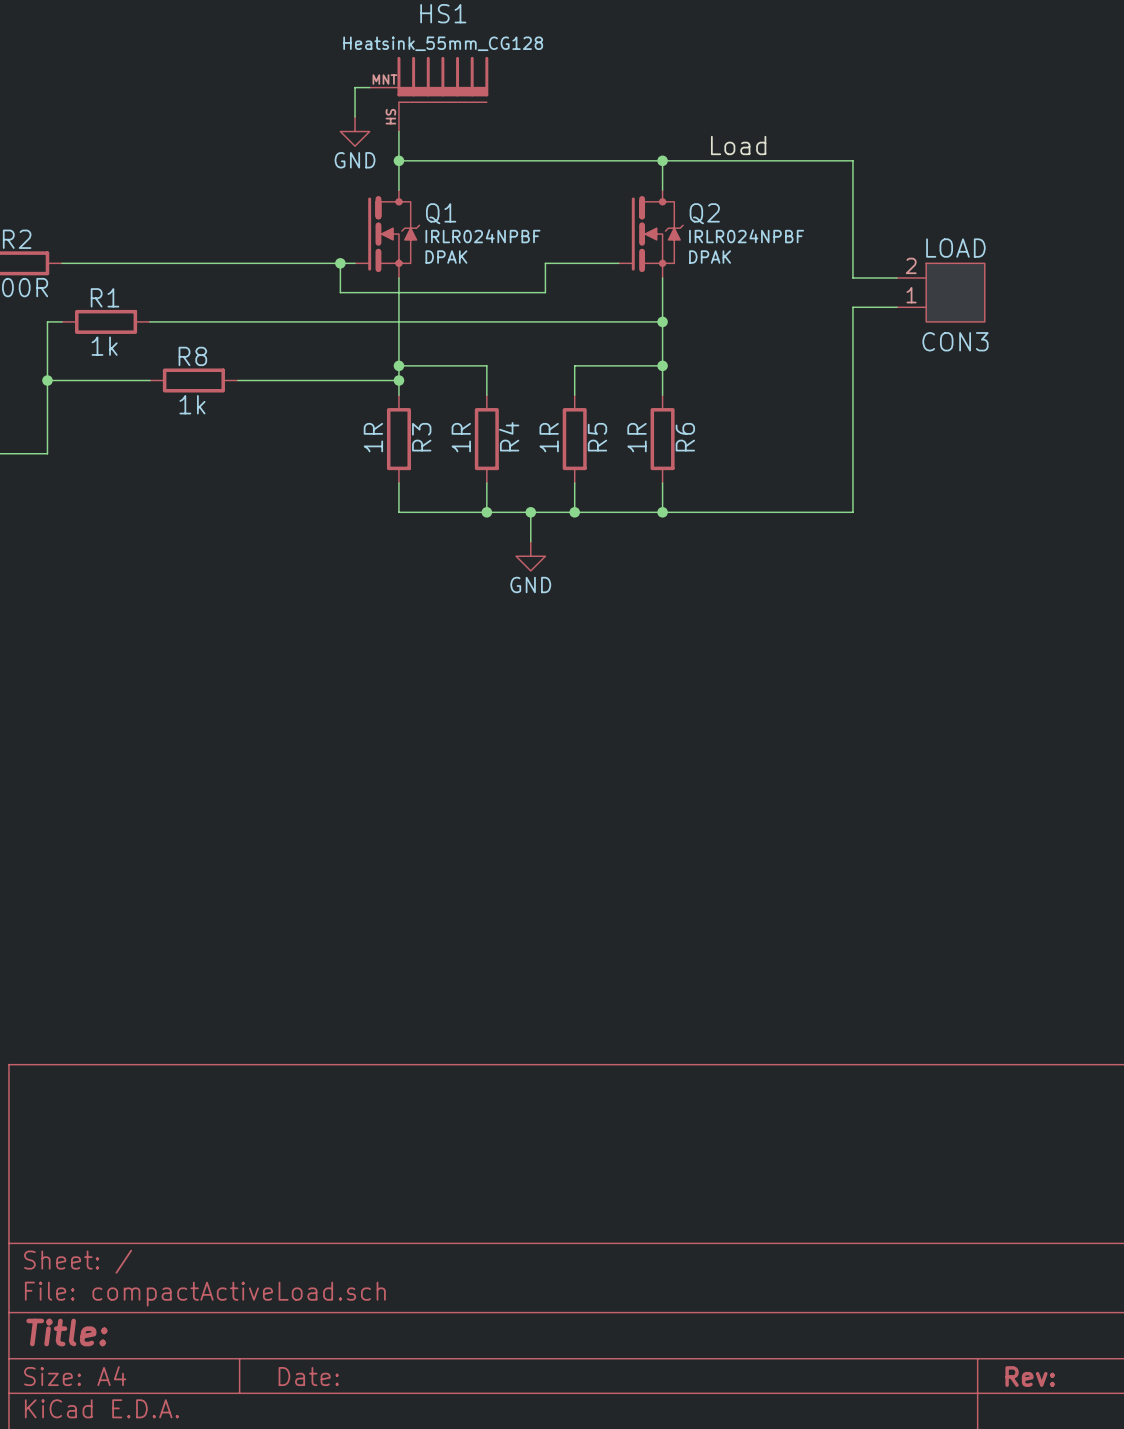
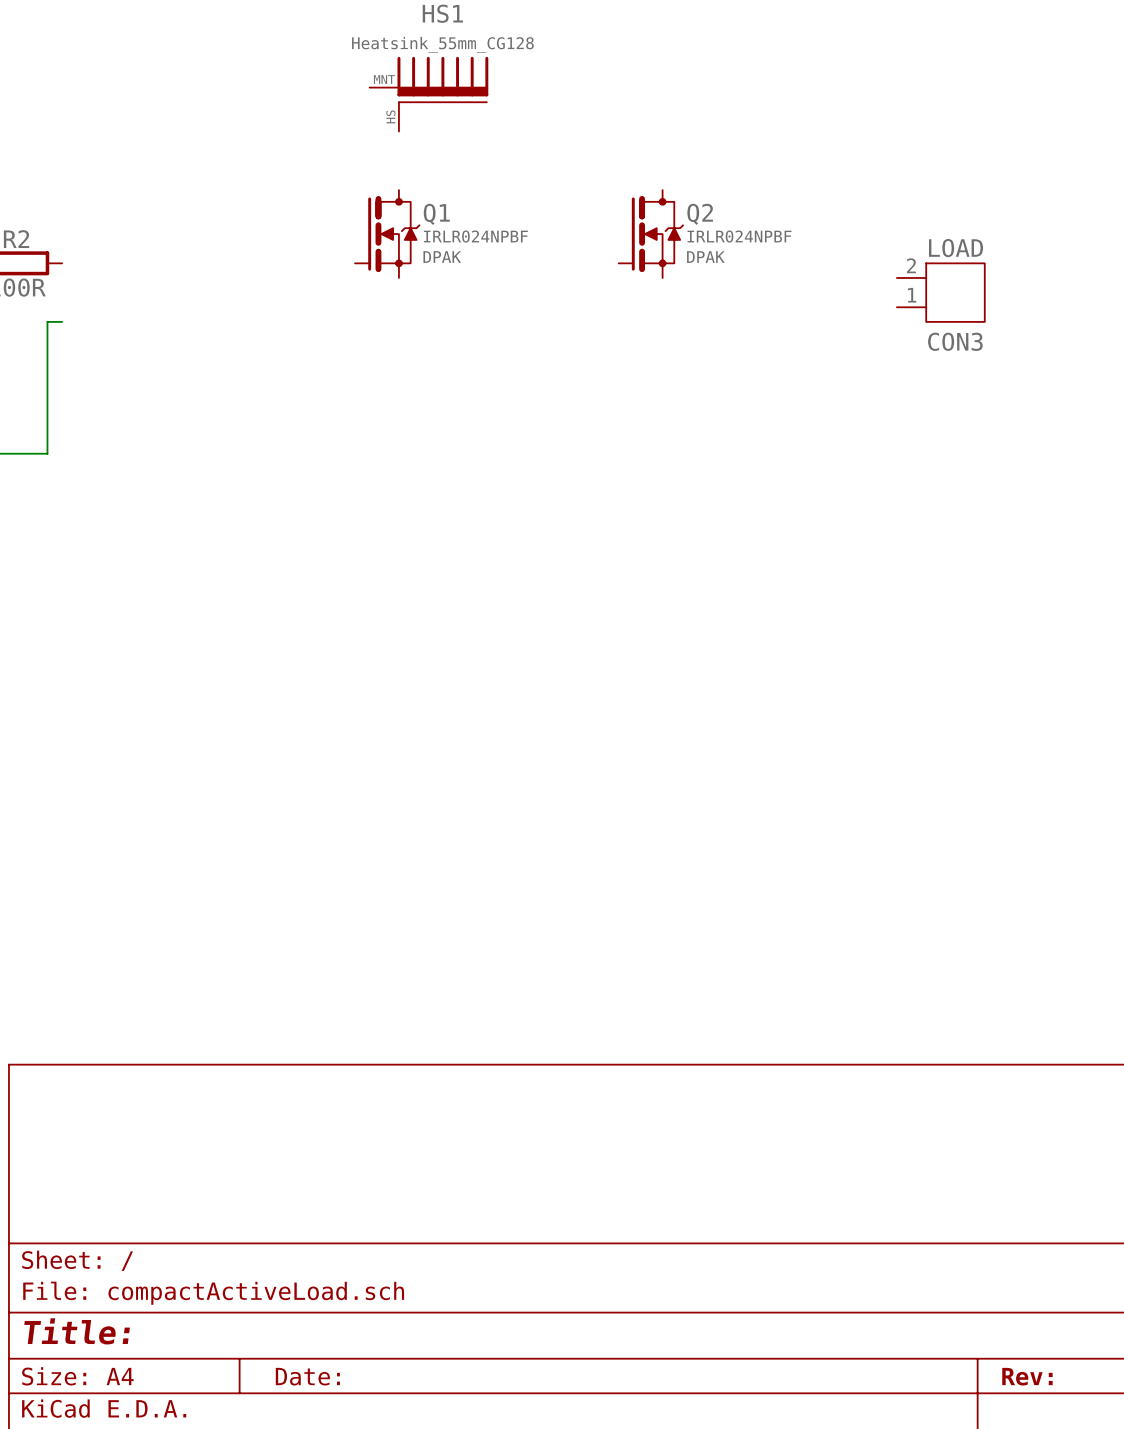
wire: (369, 87) (355, 87) (355, 116) -> none
power symbol: GND (355, 131) -> none
wire: (398, 131) (398, 190) -> none
label: Load (738, 145) -> none
wire: (398, 160) (852, 160) (852, 277) (896, 277) -> none
junction: (398, 160) -> none
wire: (662, 160) (662, 190) -> none
junction: (662, 160) -> none
wire: (62, 263) (355, 263) -> none
wire: (340, 263) (340, 292) (545, 292) (545, 263) (618, 263) -> none
junction: (340, 263) -> none
wire: (398, 277) (398, 395) -> none
wire: (662, 277) (662, 395) -> none
wire: (896, 307) (852, 307) (852, 512) (398, 512) (398, 483) -> none
R1: 1k (106, 321) -> none
wire: (149, 321) (662, 321) -> none
junction: (662, 321) -> none
wire: (398, 365) (486, 365) (486, 395) -> none
junction: (398, 365) -> none
wire: (662, 365) (574, 365) (574, 395) -> none
junction: (662, 365) -> none
wire: (47, 380) (149, 380) -> none
junction: (47, 380) -> none
R8: 1k (193, 380) -> none
wire: (237, 380) (398, 380) -> none
junction: (398, 380) -> none
R3: 1R (398, 439) -> none
R4: 1R (486, 439) -> none
R5: 1R (574, 439) -> none
R6: 1R (662, 439) -> none
wire: (486, 483) (486, 512) -> none
wire: (574, 483) (574, 512) -> none
wire: (662, 483) (662, 512) -> none
junction: (486, 512) -> none
wire: (530, 512) (530, 541) -> none
junction: (530, 512) -> none
junction: (574, 512) -> none
junction: (662, 512) -> none
power symbol: GND (530, 556) -> none

